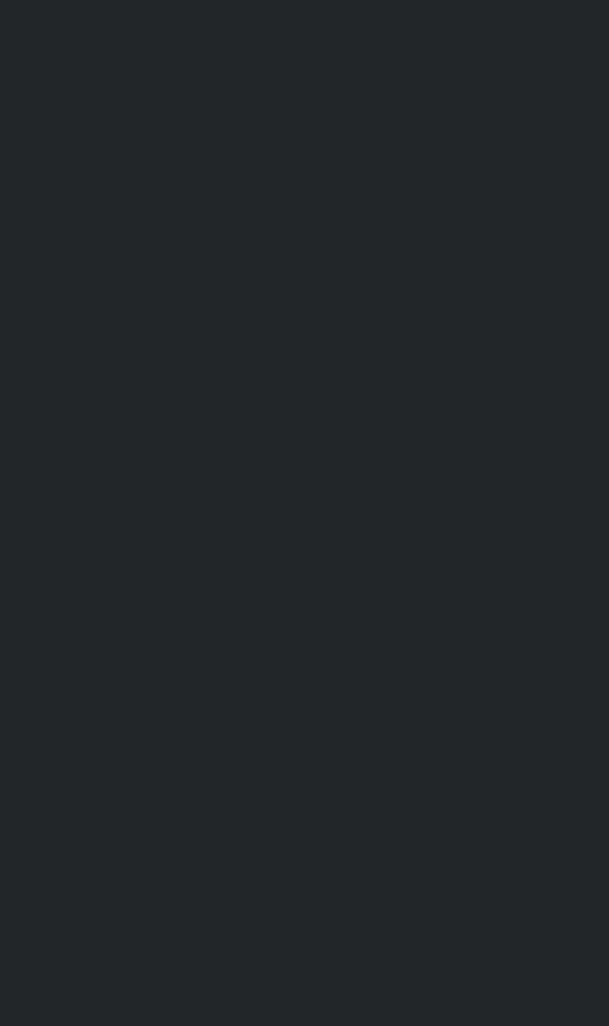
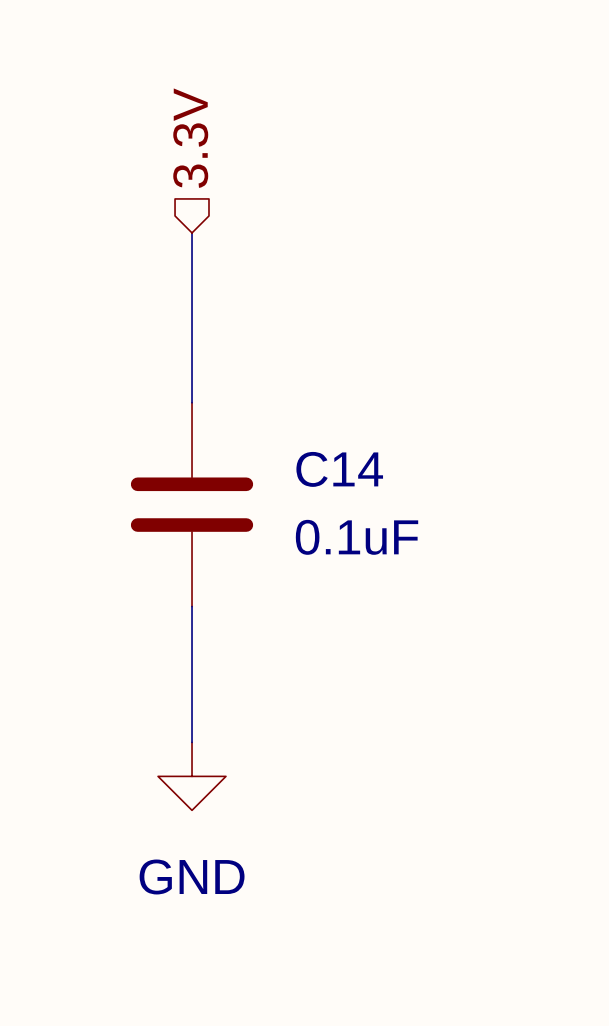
hierarchical label: none -> 3.3V (190, 138)
wire: none -> (192, 232) (192, 402)
C14: none -> 0.1uF (192, 504)
wire: none -> (192, 606) (192, 742)
power symbol: none -> GND (192, 776)

